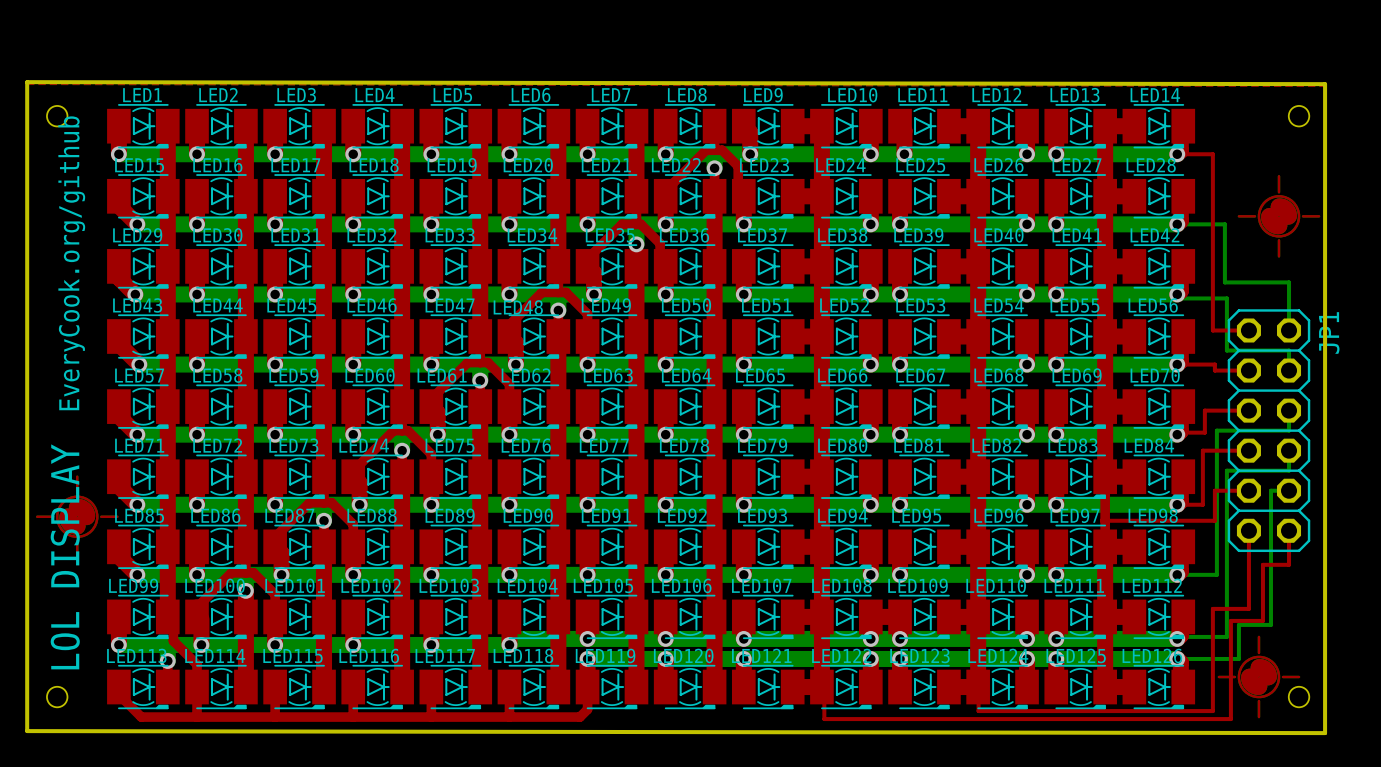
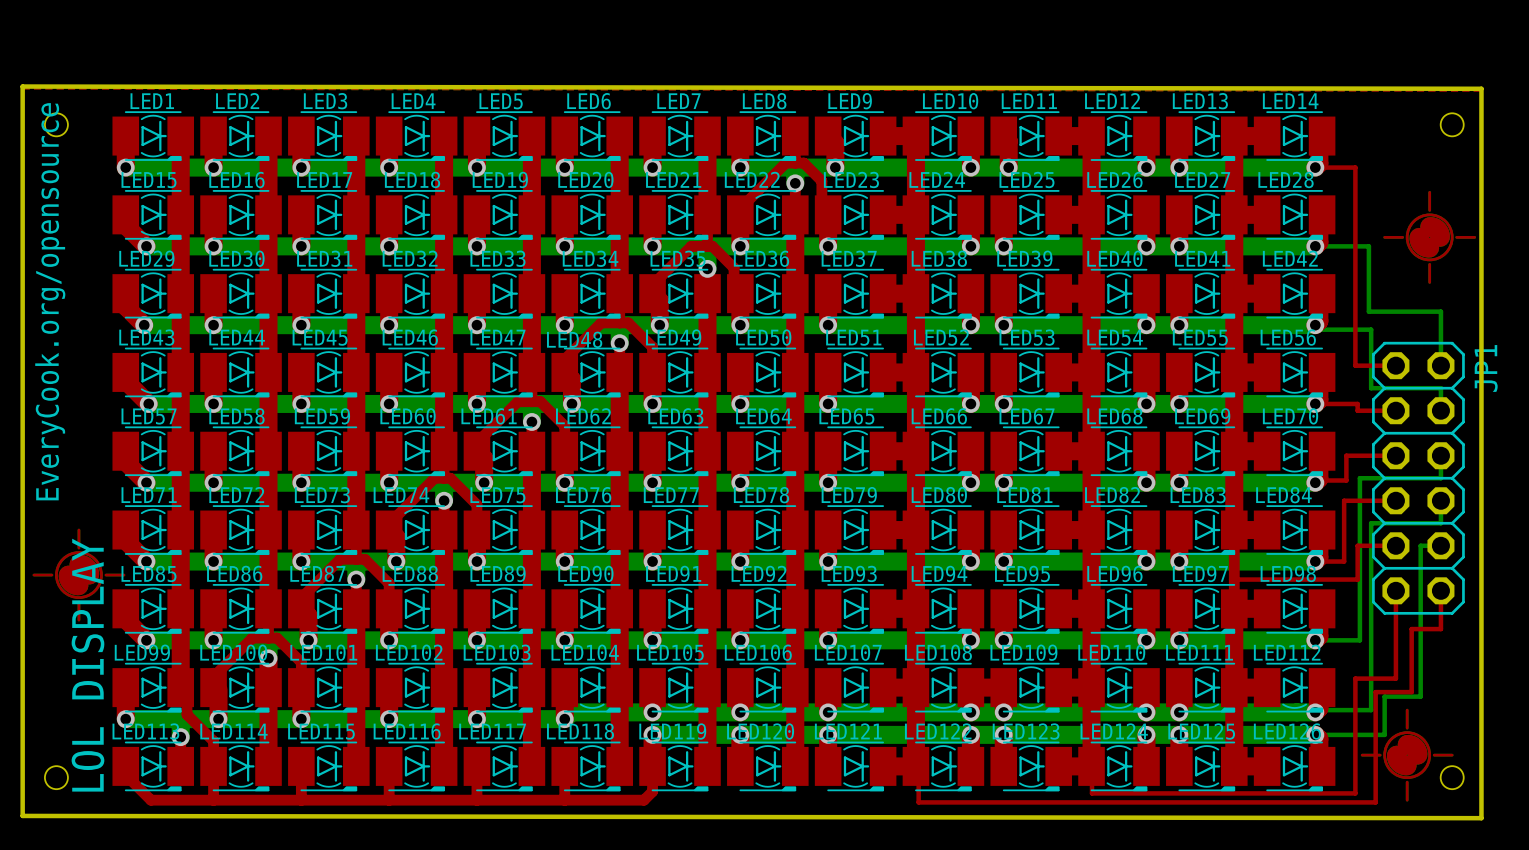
text: EveryCook.org/github (71, 263) -> EveryCook.org/opensource (50, 301)
text position: LOL DISPLAY (65, 556) -> LOL DISPLAY (87, 665)

